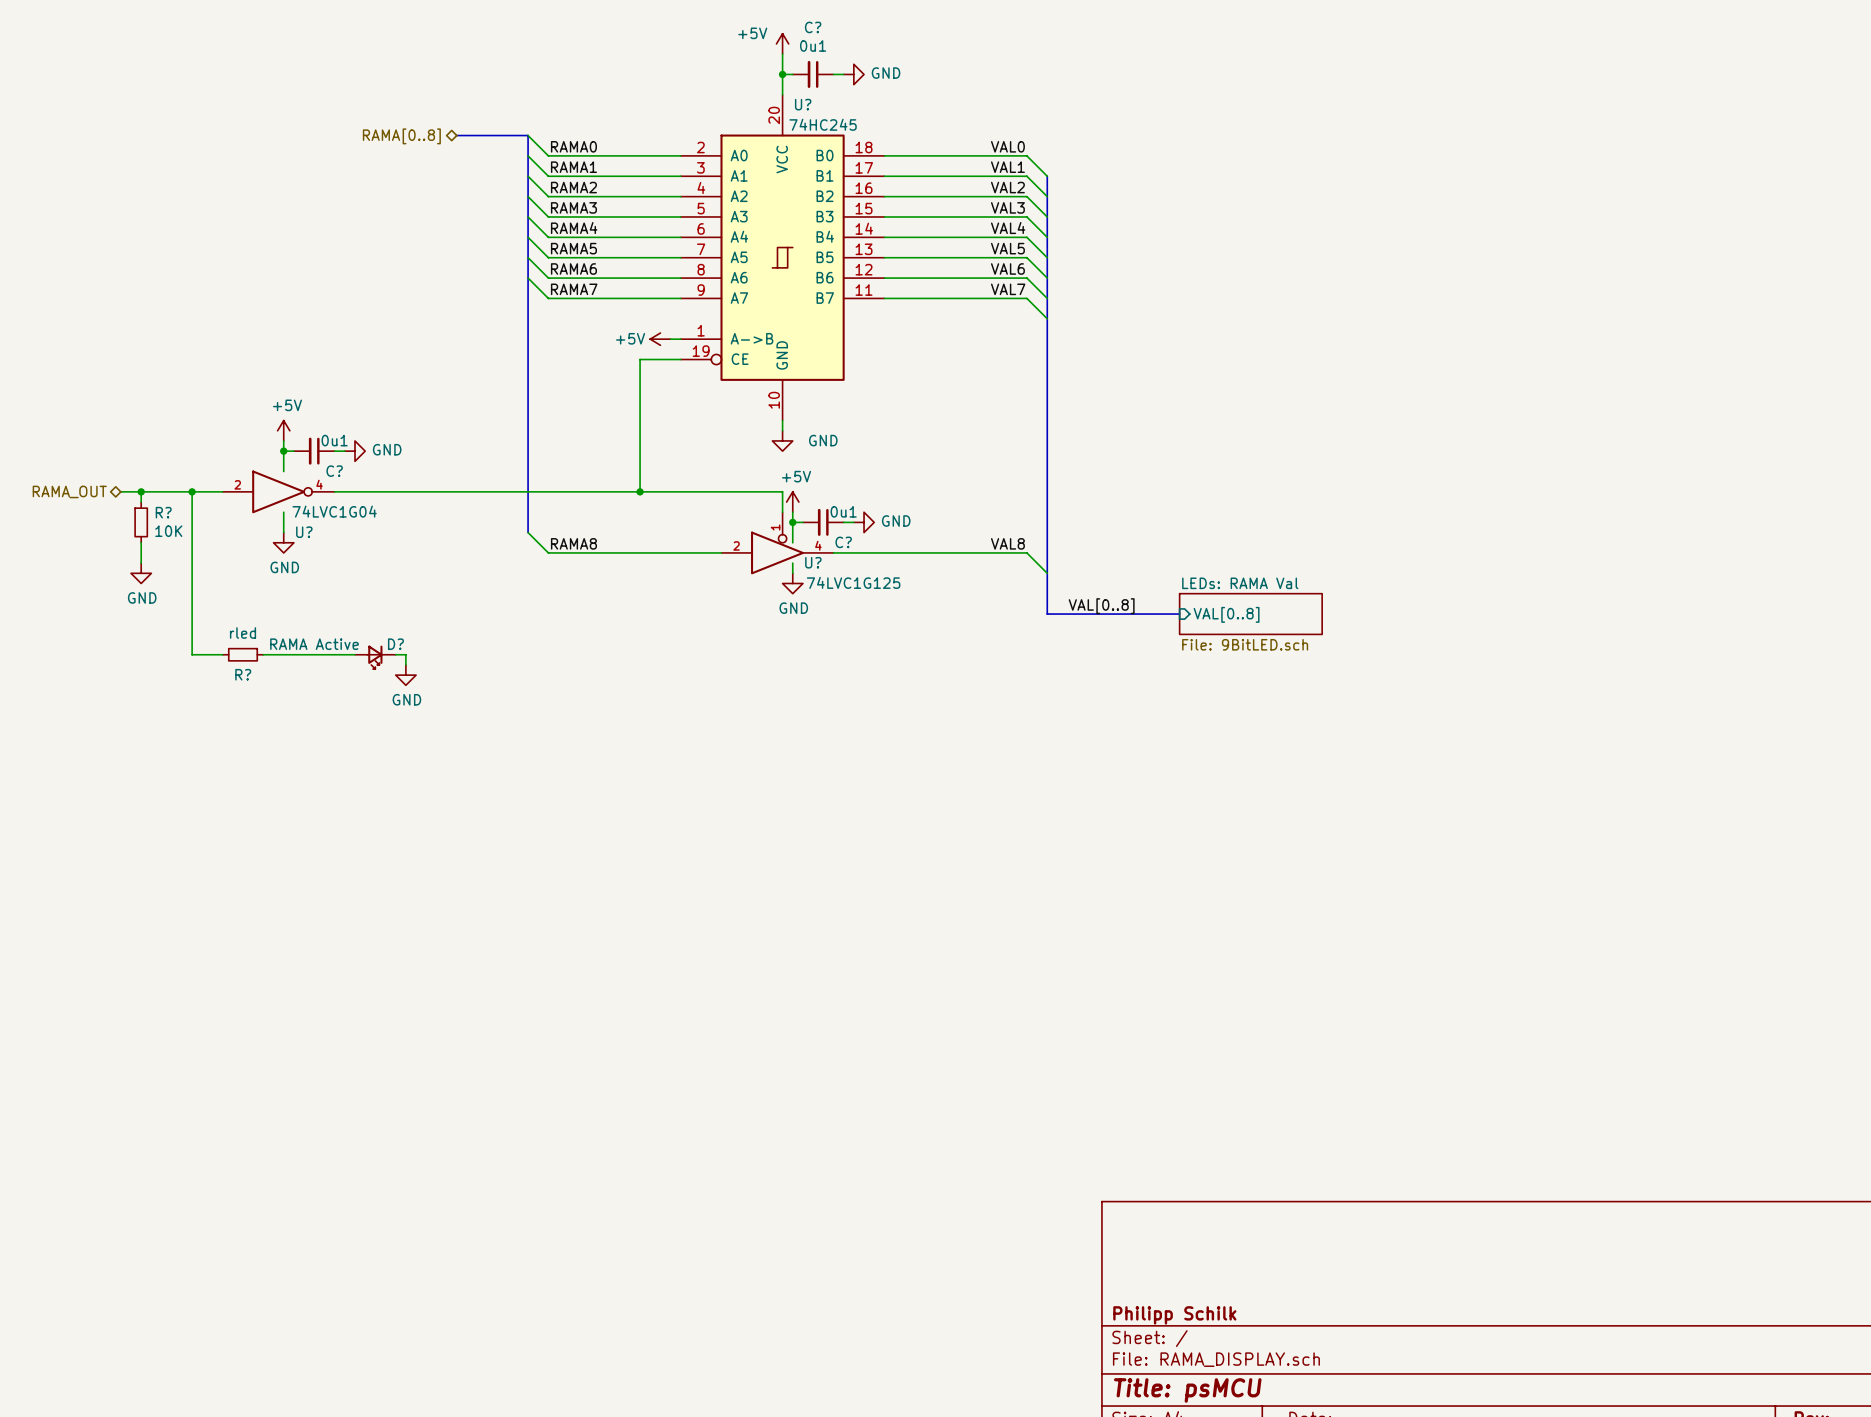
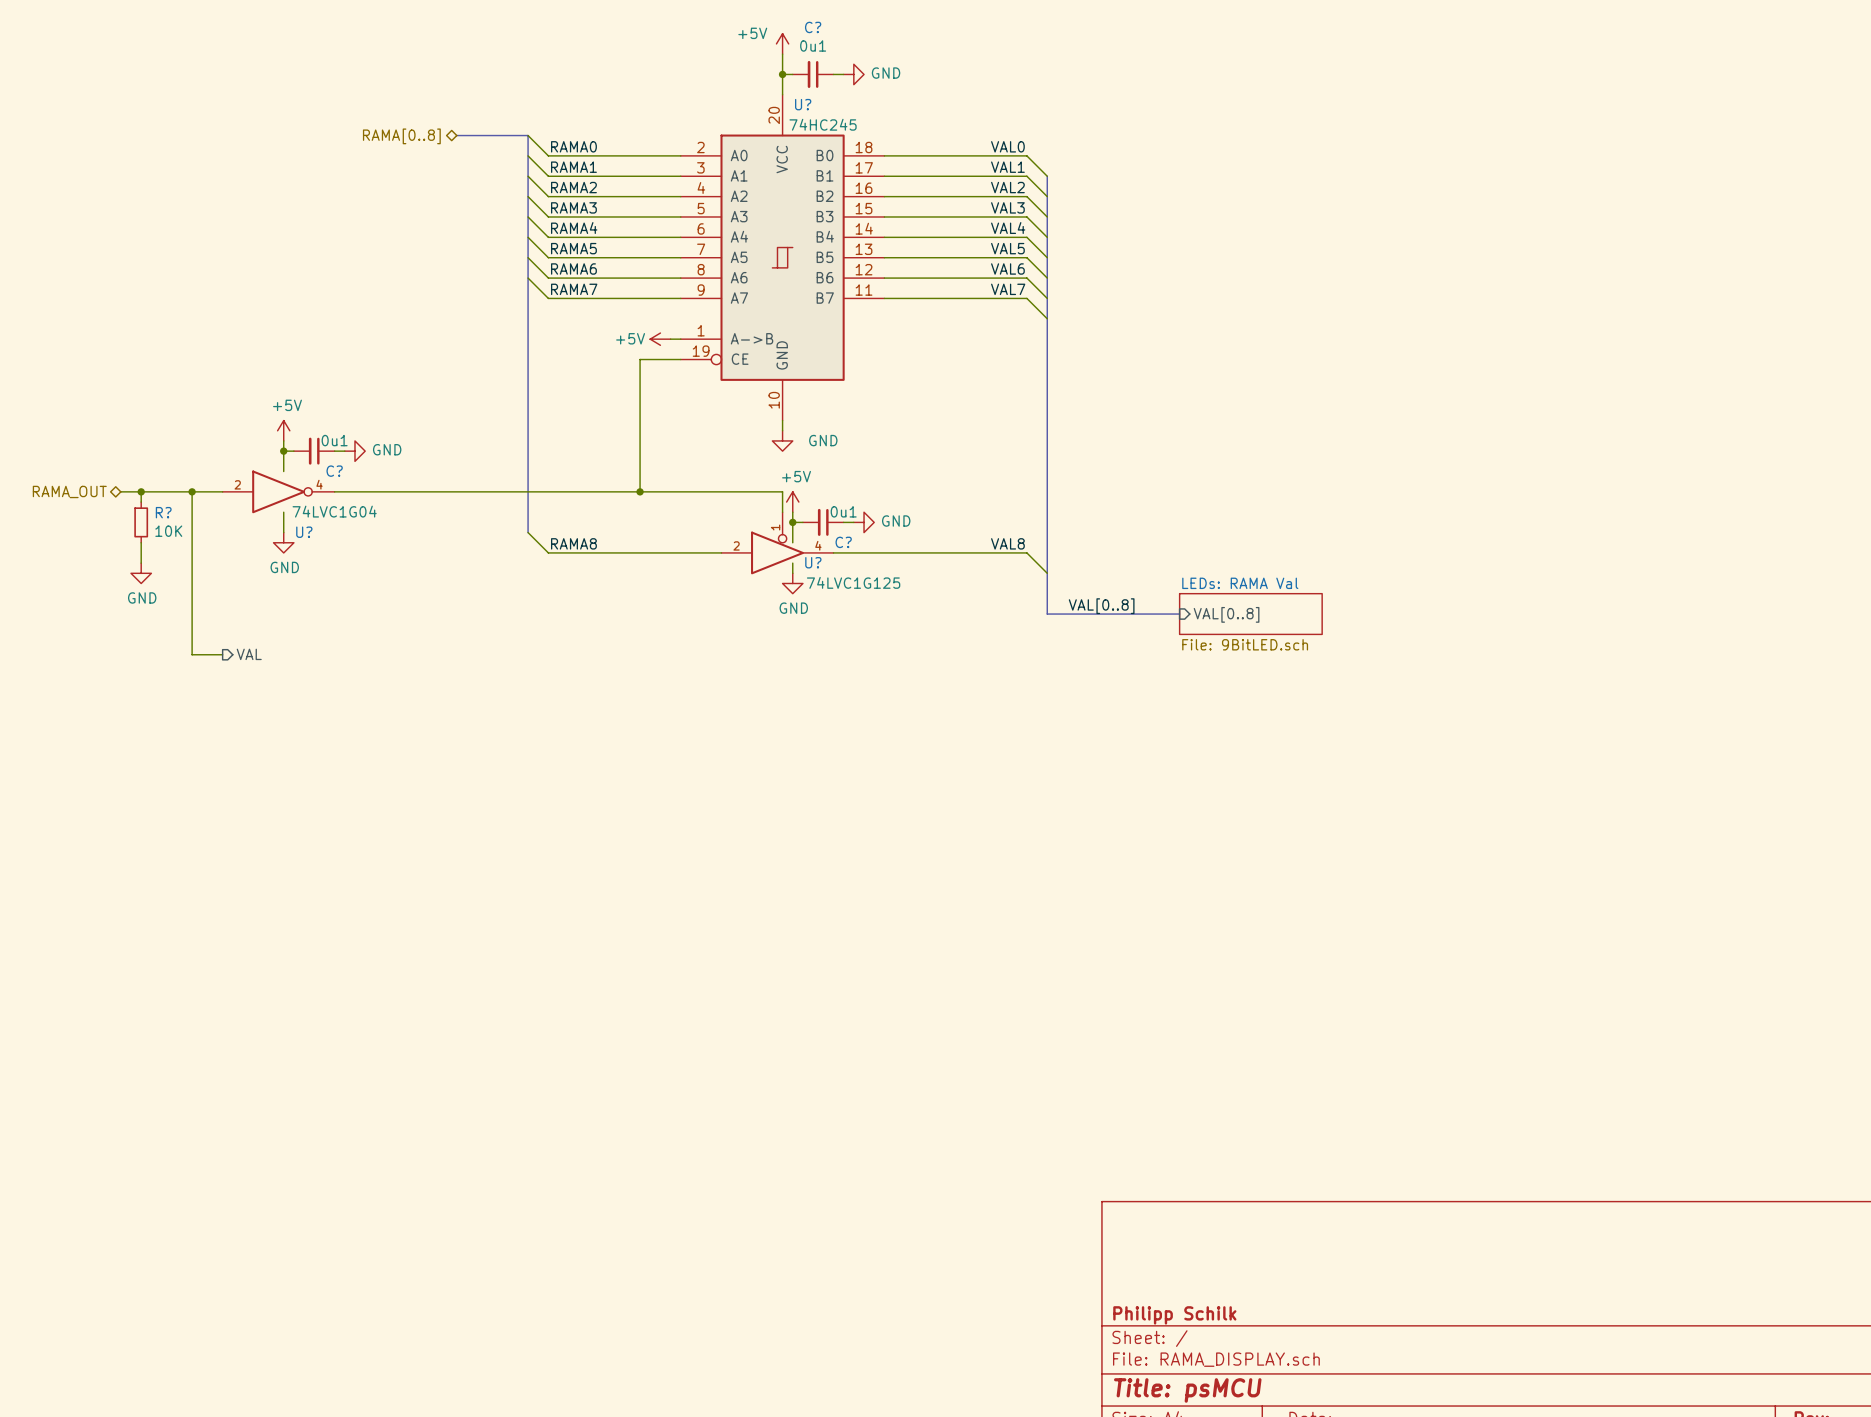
R?: rled (243, 654) -> none
sheet pin: none -> VAL (249, 654)
wire: (263, 654) (354, 654) -> none
wire: (395, 654) (405, 654) (405, 664) -> none
D?: RAMA Active (375, 657) -> none
power symbol: GND (405, 675) -> none

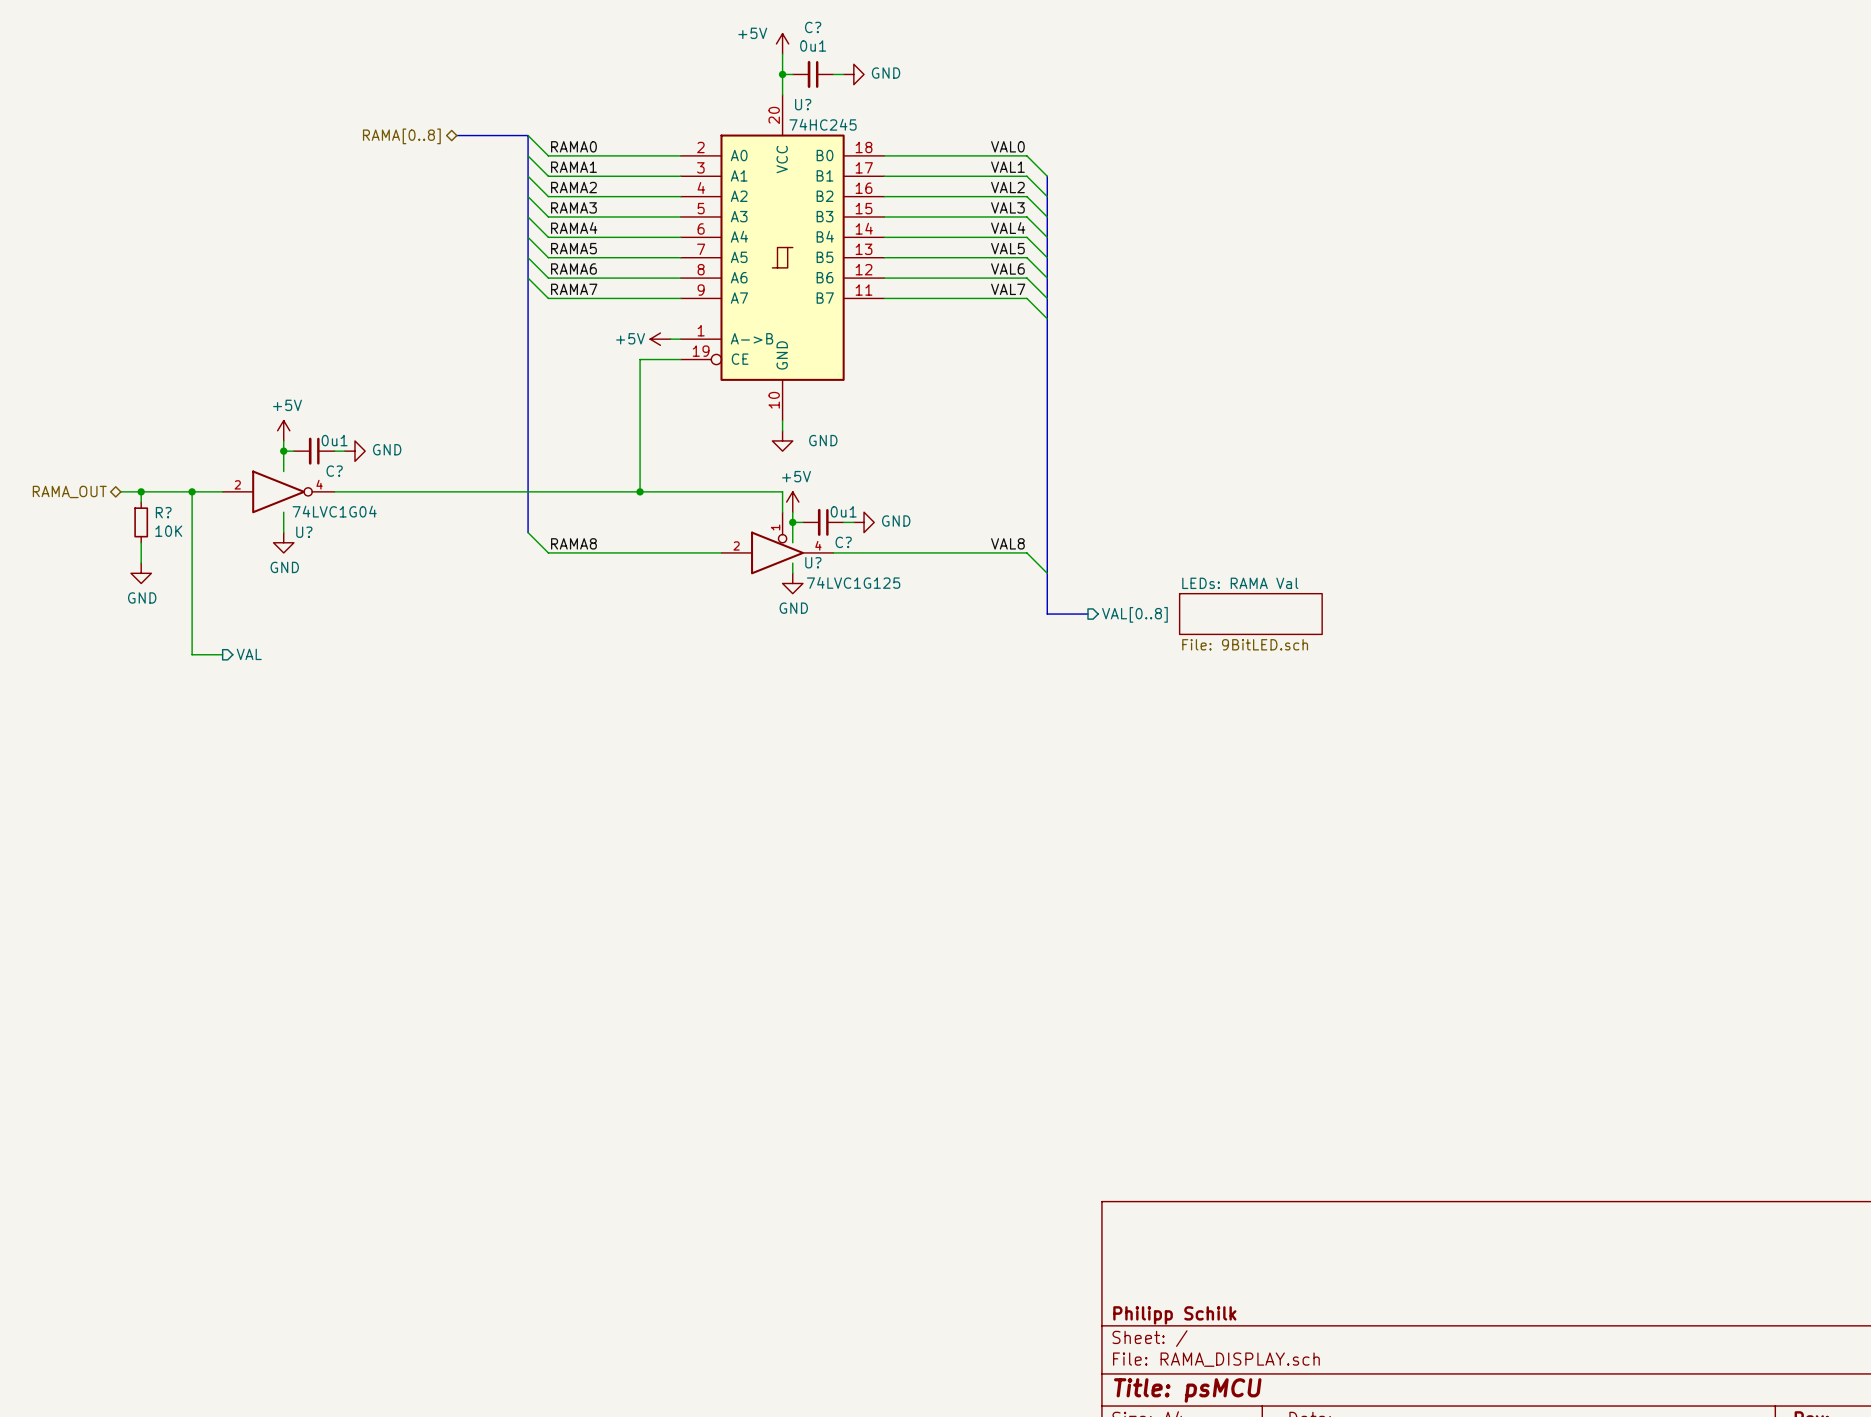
label: VAL[0..8] (1101, 606) -> none
bus: (1087, 614) (1179, 614) -> none
sheet pin position: VAL[0..8] (1226, 614) -> VAL[0..8] (1134, 614)

